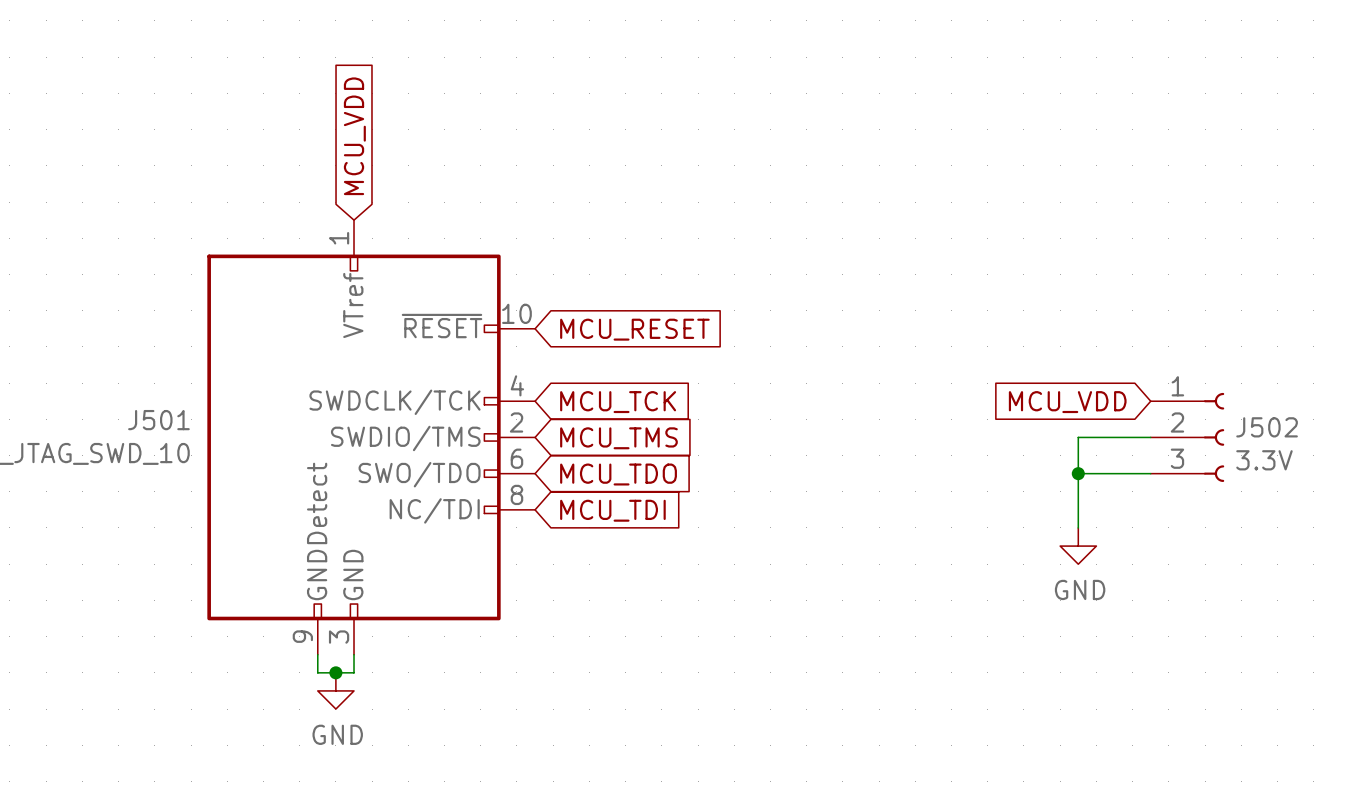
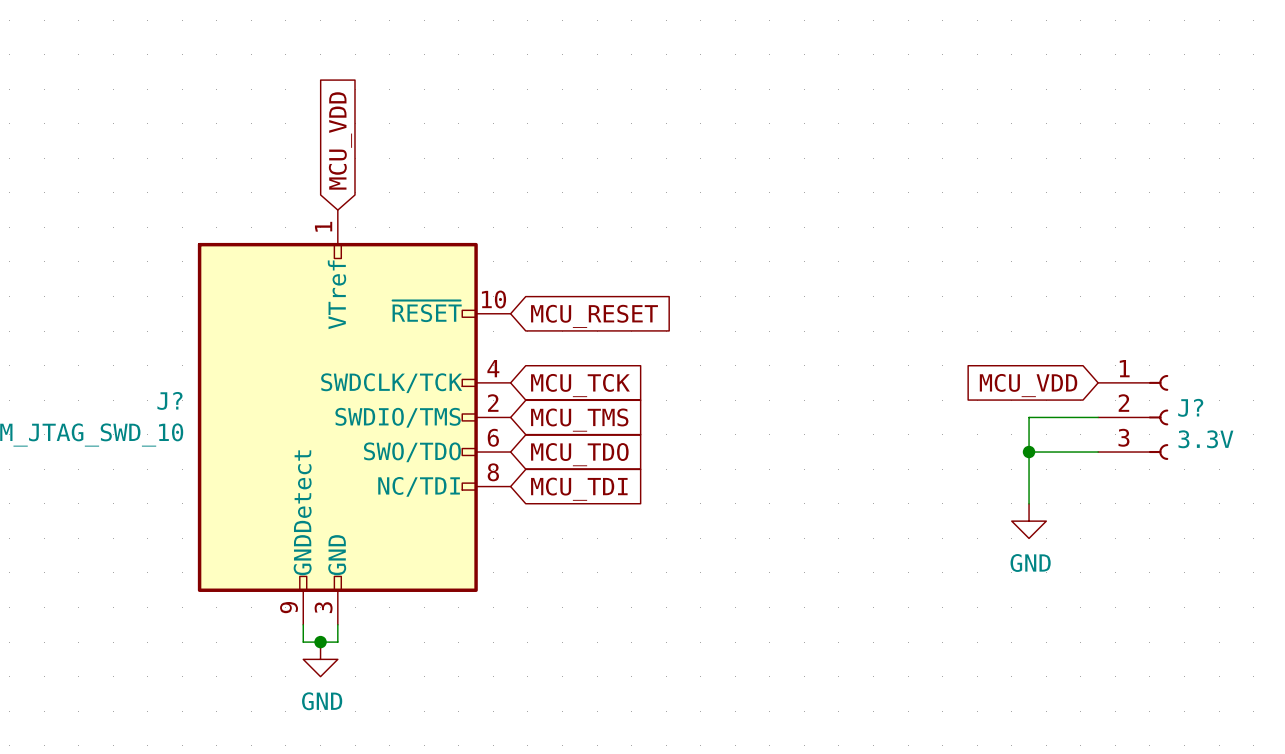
J501 name: J501 (158, 420) -> J? (169, 400)
J502 name: J502 (1267, 427) -> J? (1190, 407)

